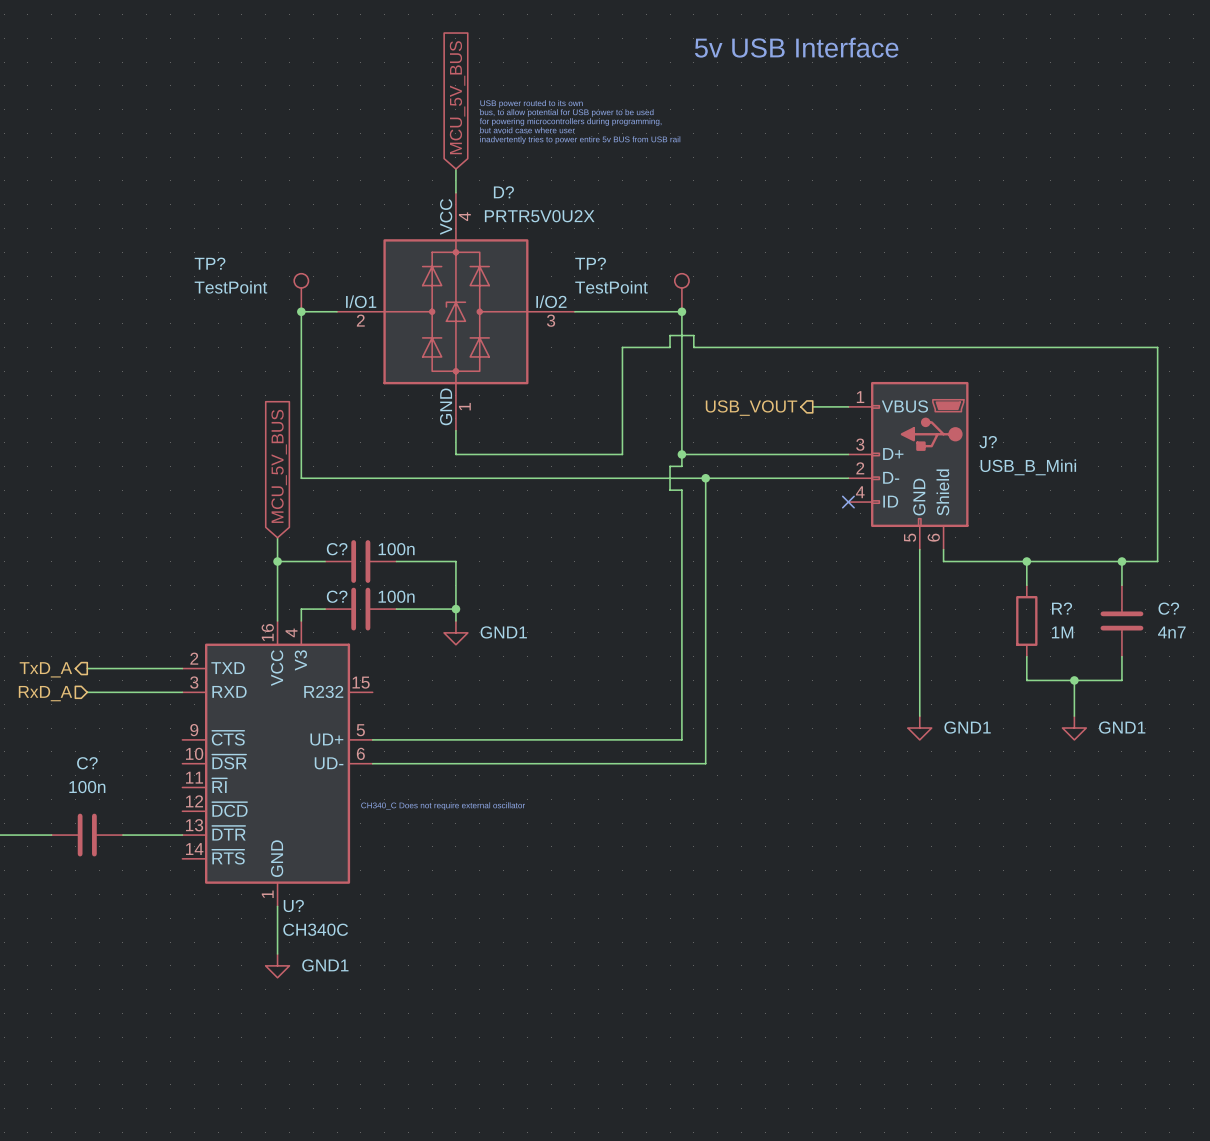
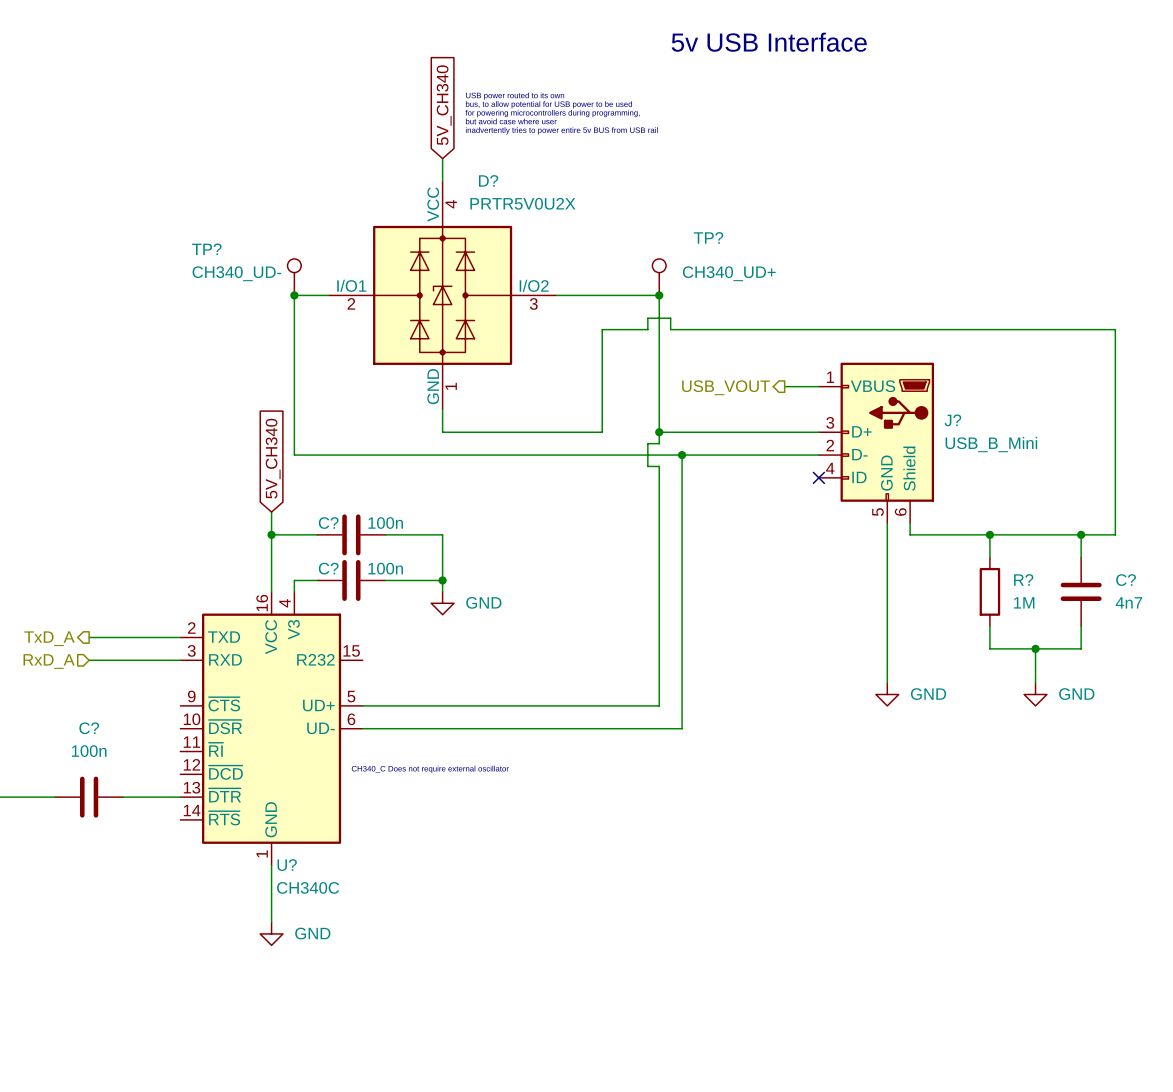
global label: MCU_5V_BUS (457, 97) -> 5V_CH340 (444, 105)
TP? name position: TP? (590, 263) -> TP? (708, 237)
TP? value: TestPoint (230, 287) -> CH340_UD- (236, 273)
TP? value: TestPoint (611, 287) -> CH340_UD+ (729, 273)
global label: MCU_5V_BUS (279, 466) -> 5V_CH340 (273, 458)
power symbol: GND1 (455, 632) -> GND (442, 603)
power symbol: GND1 (919, 728) -> GND (887, 694)
power symbol: GND1 (1074, 728) -> GND (1035, 694)
power symbol: GND1 (277, 965) -> none
power symbol: none -> GND (271, 933)

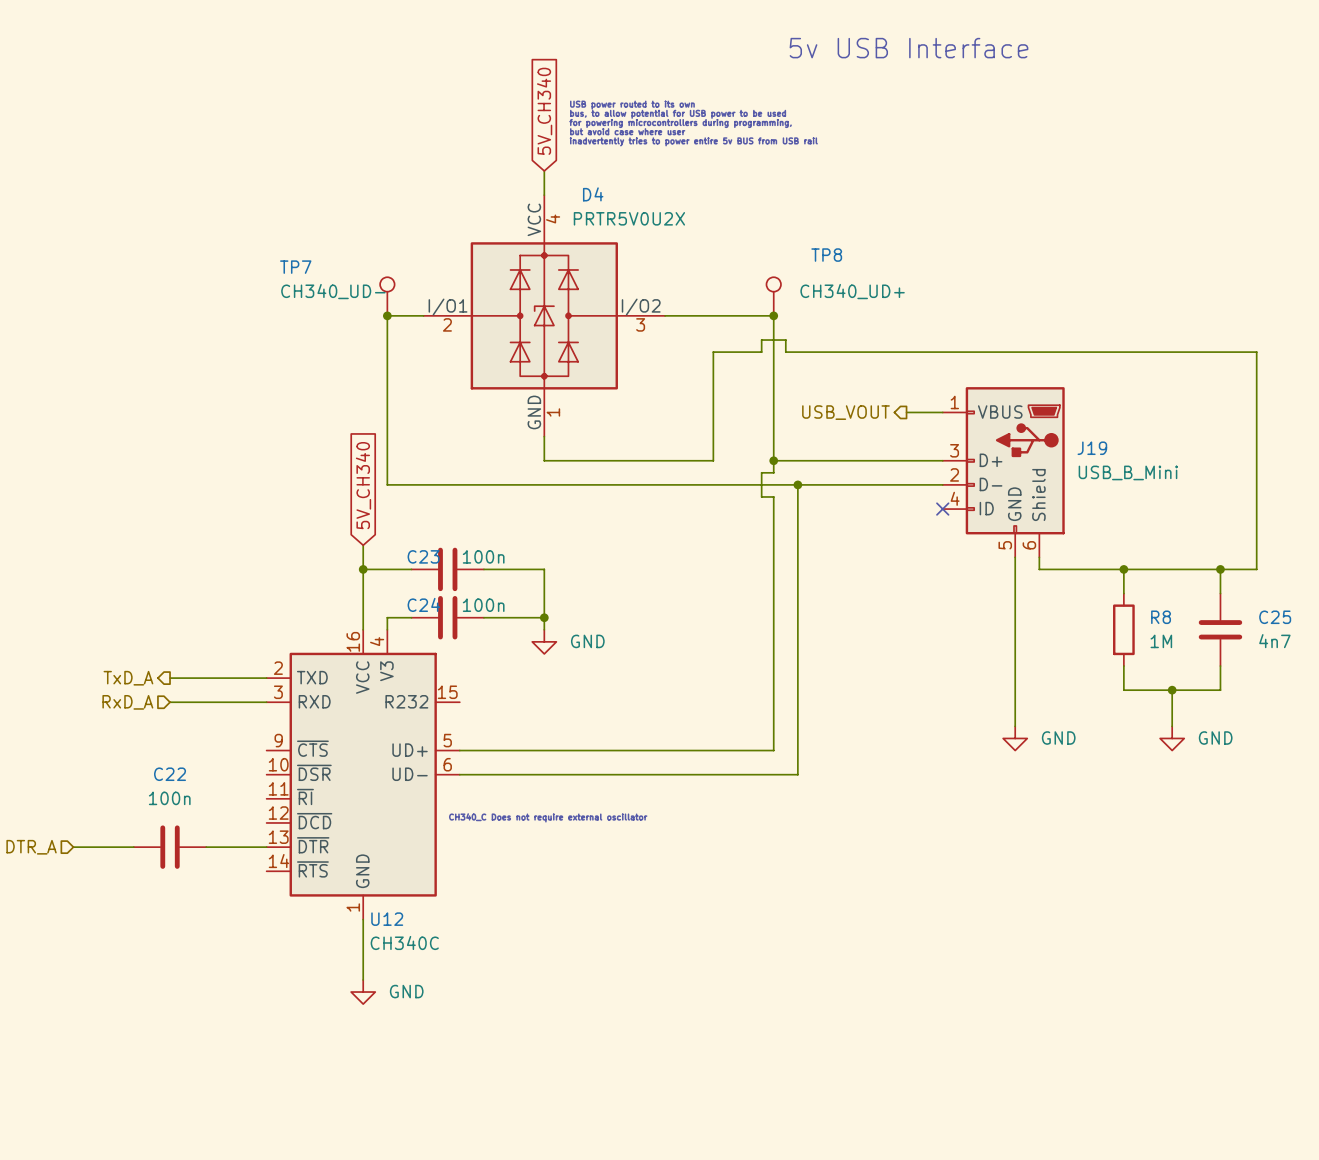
D? name: D? (488, 180) -> D4 (593, 194)
TP? name: TP? (708, 237) -> TP8 (826, 255)
TP? name: TP? (206, 249) -> TP7 (295, 267)
J? name: J? (952, 420) -> J19 (1092, 448)
C? name: C? (328, 523) -> C23 (423, 556)
C? name: C? (328, 568) -> C24 (423, 604)
R? name: R? (1023, 579) -> R8 (1161, 617)
C? name: C? (1126, 580) -> C25 (1275, 617)
C? name: C? (89, 728) -> C22 (170, 774)
U? name: U? (287, 865) -> U12 (387, 919)

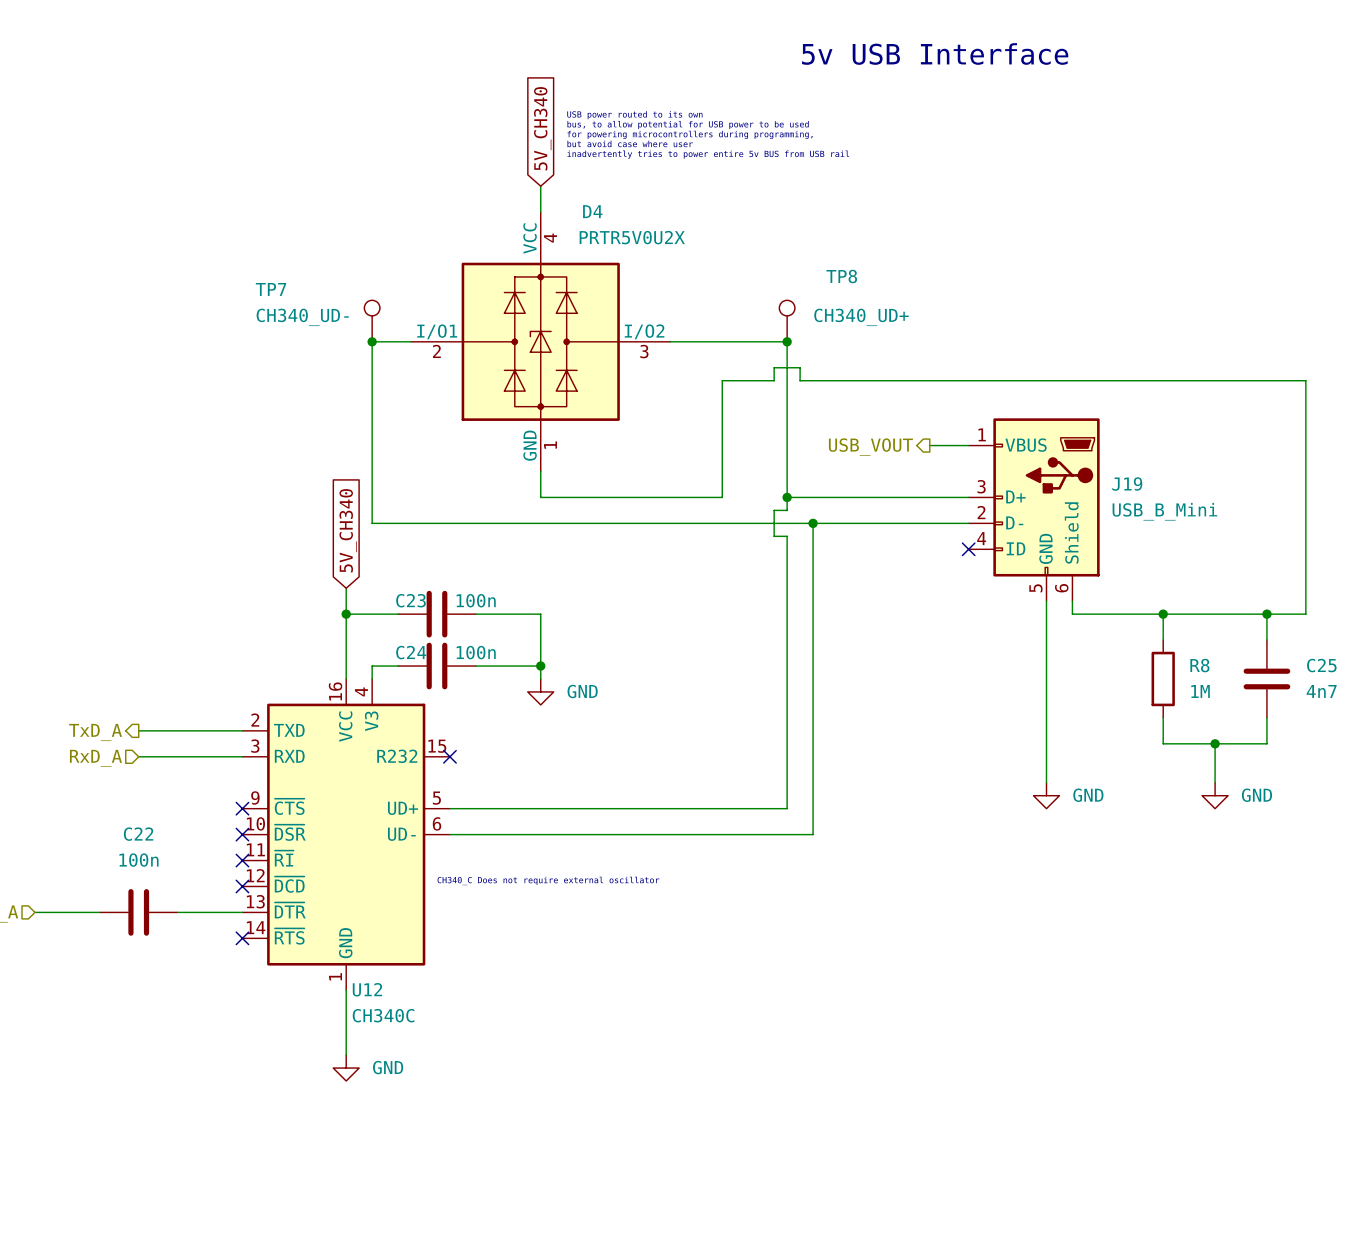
no-connect mark: none -> (449, 756)
no-connect mark: none -> (242, 808)
no-connect mark: none -> (242, 834)
no-connect mark: none -> (242, 860)
no-connect mark: none -> (242, 886)
no-connect mark: none -> (242, 938)

